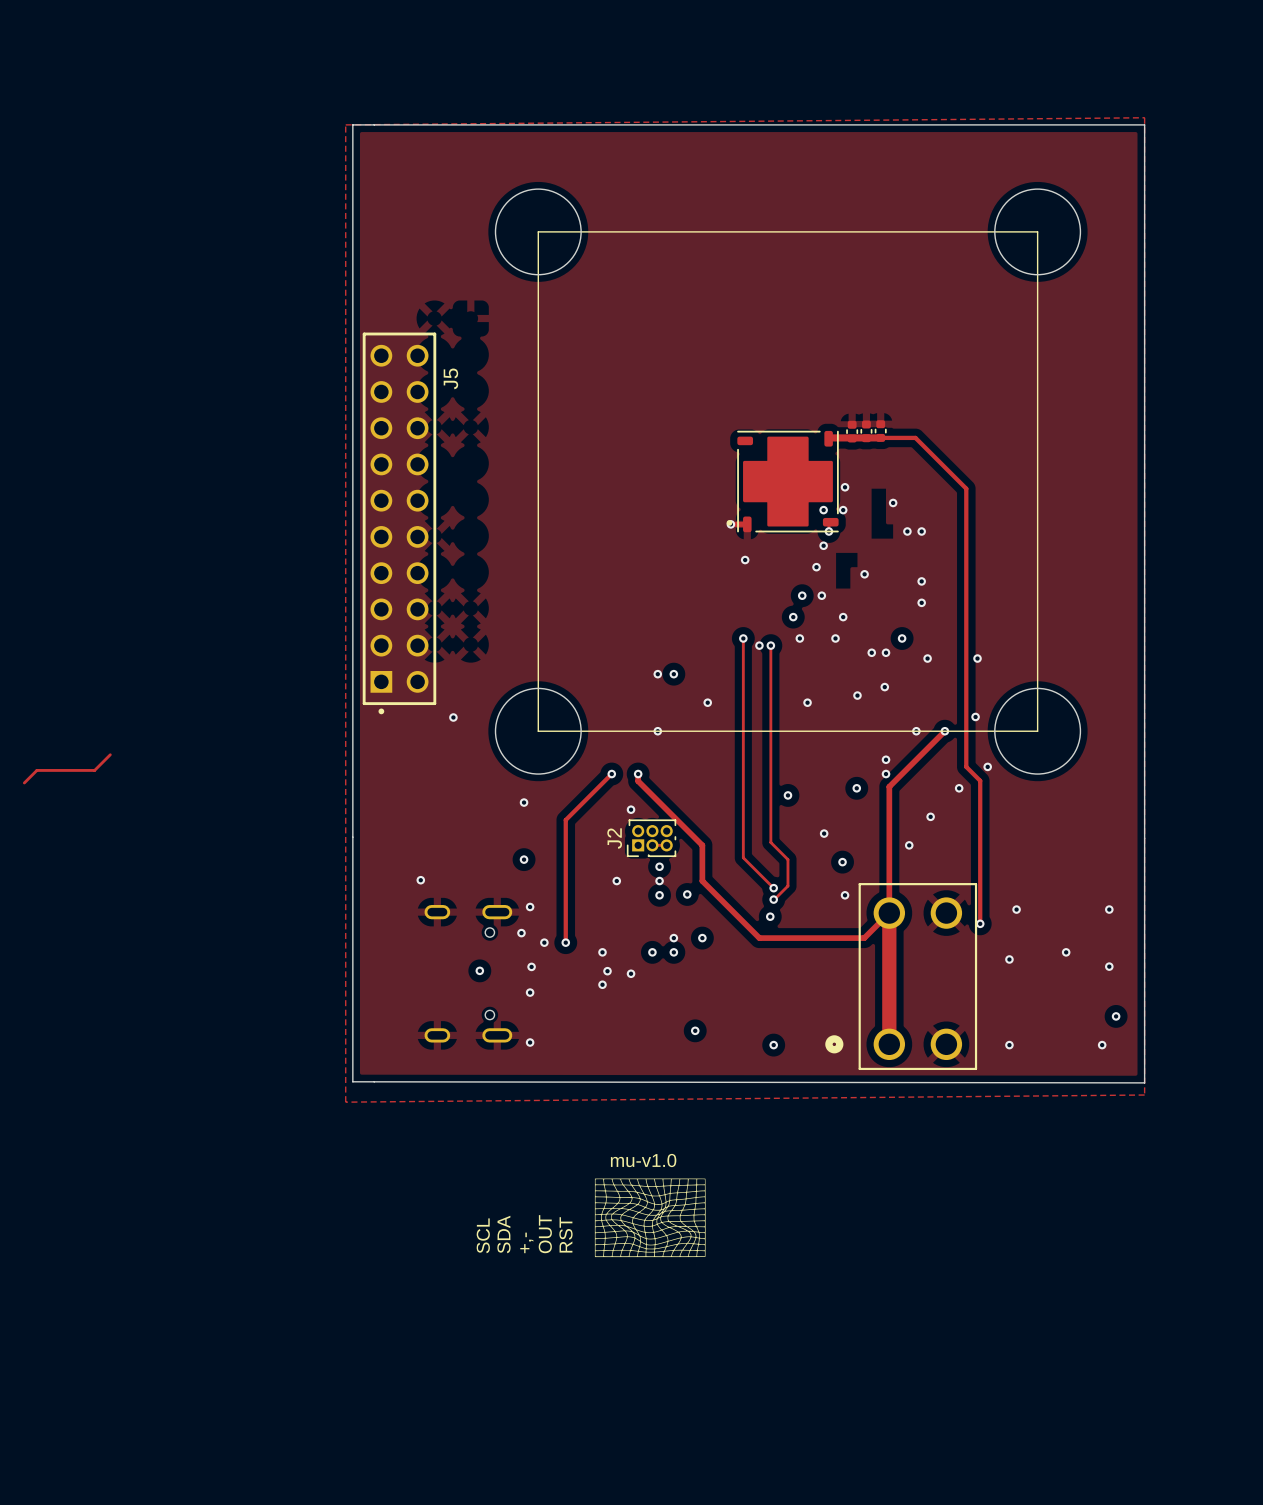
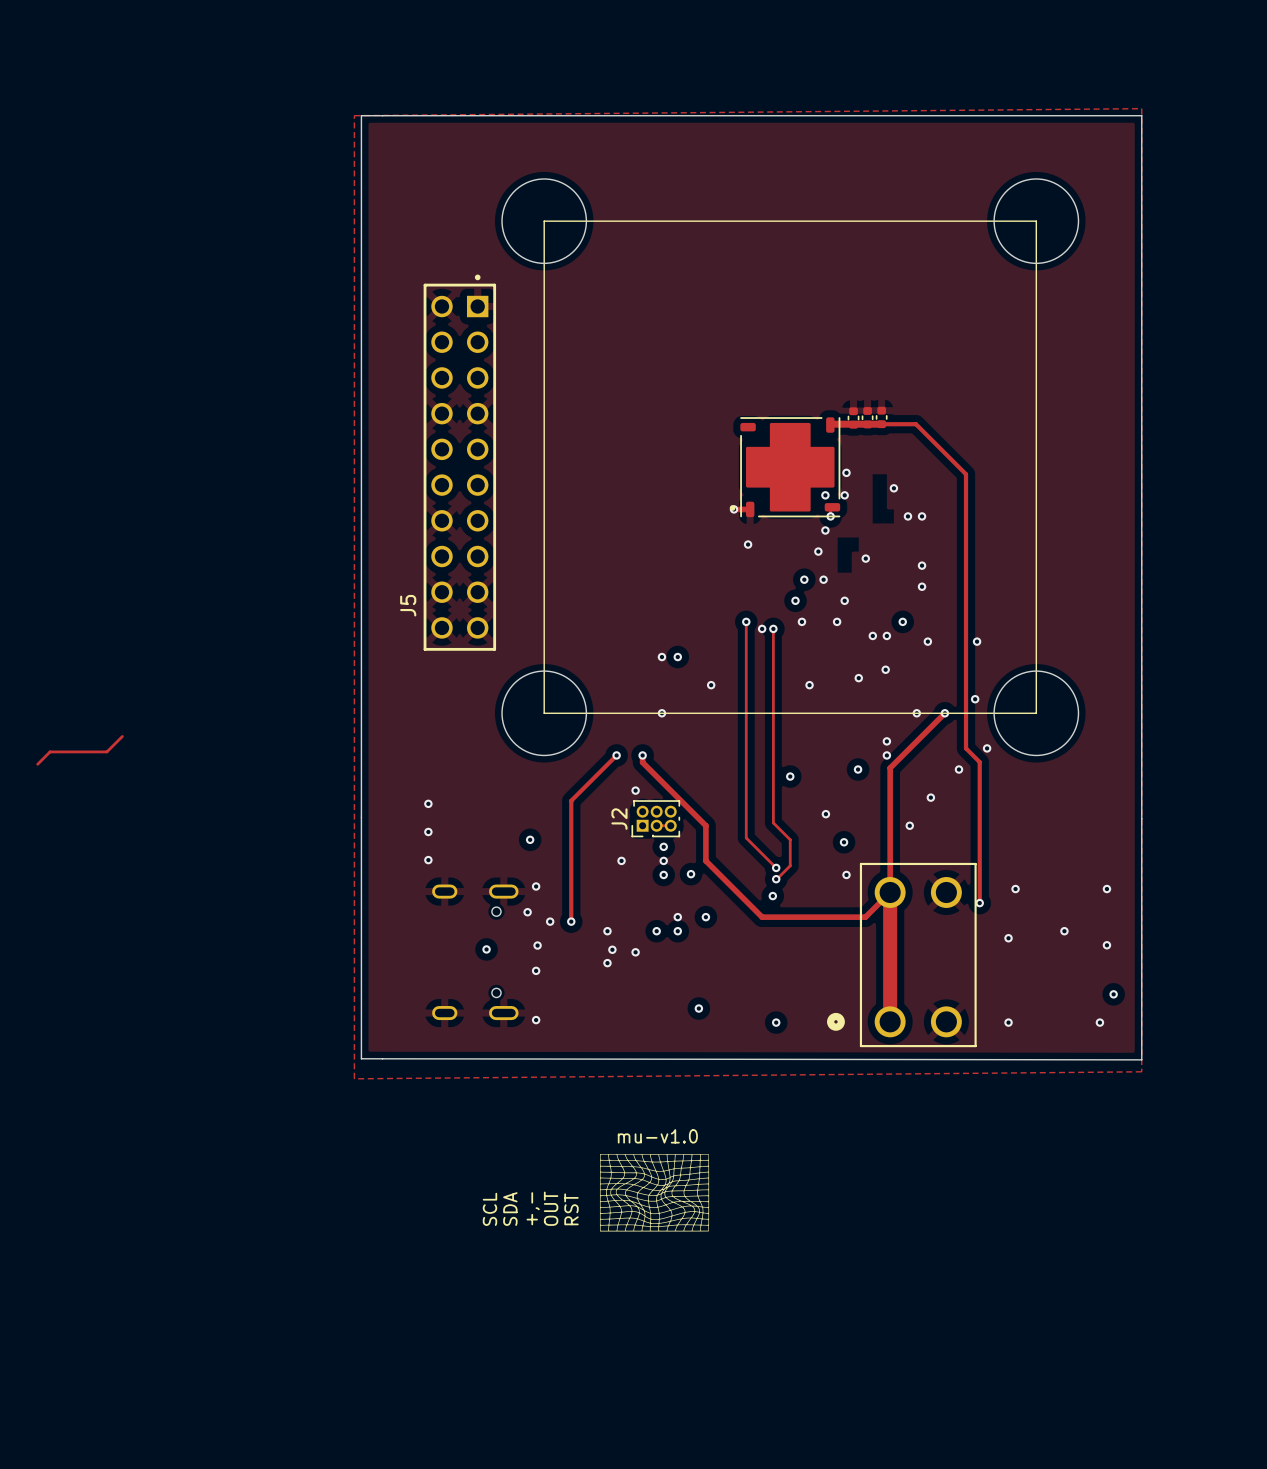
J5 rotation: 0° (399, 523) -> 180° (459, 462)
via: (453, 717) -> none
via: (524, 802) -> none
via: none -> (428, 803)
via: none -> (428, 831)

